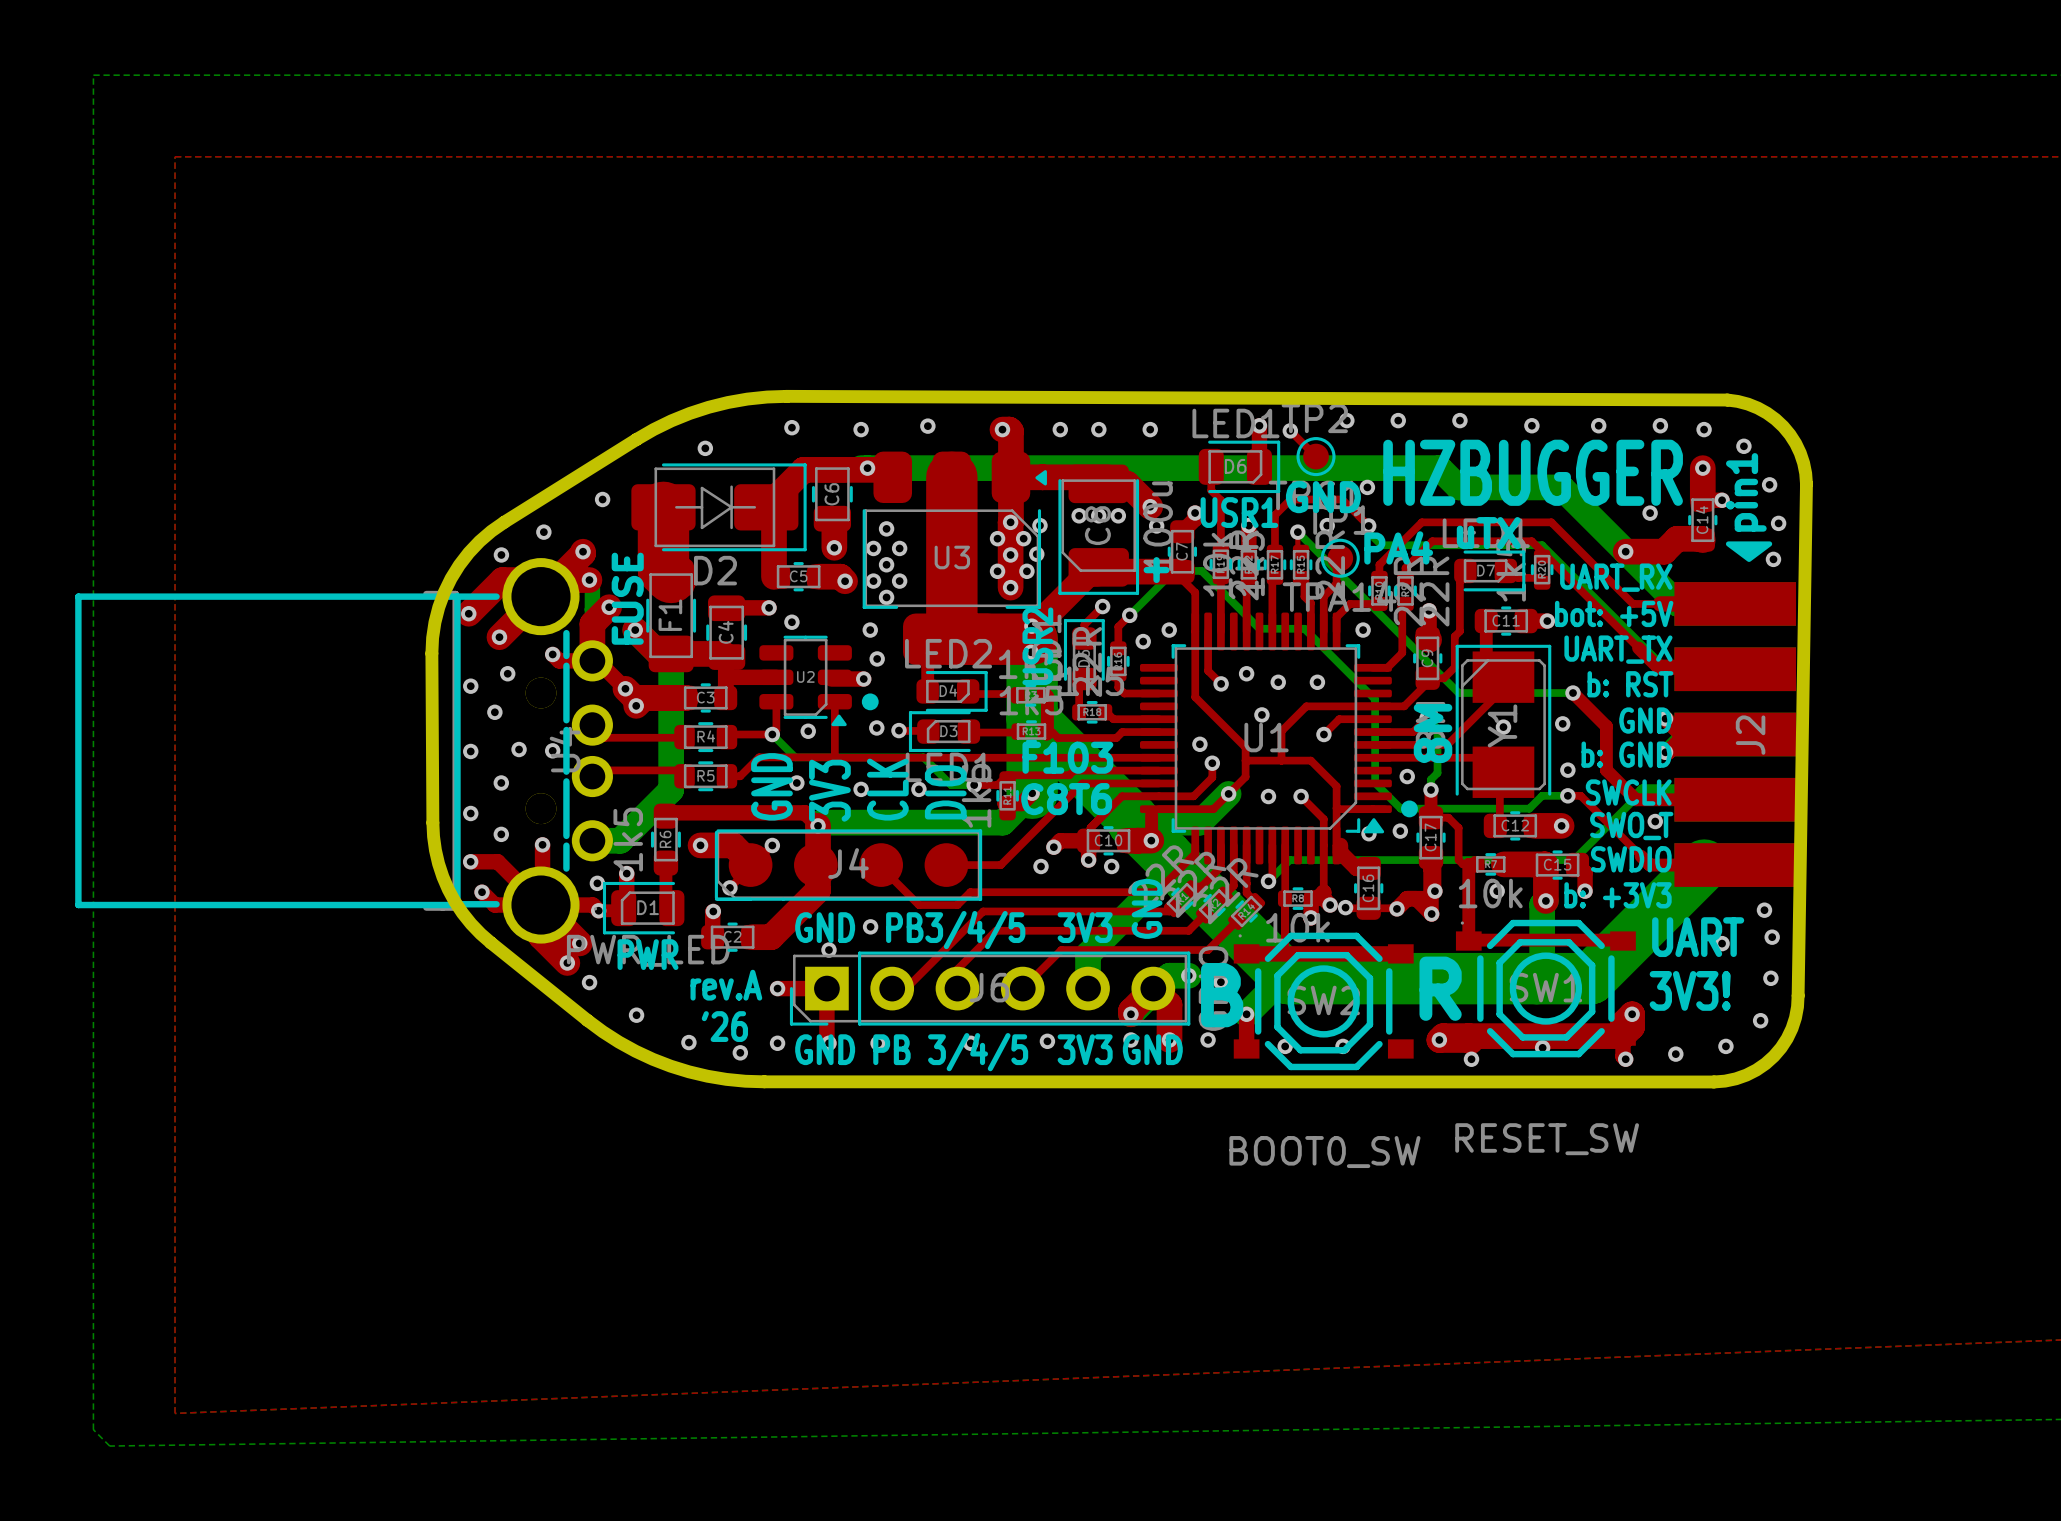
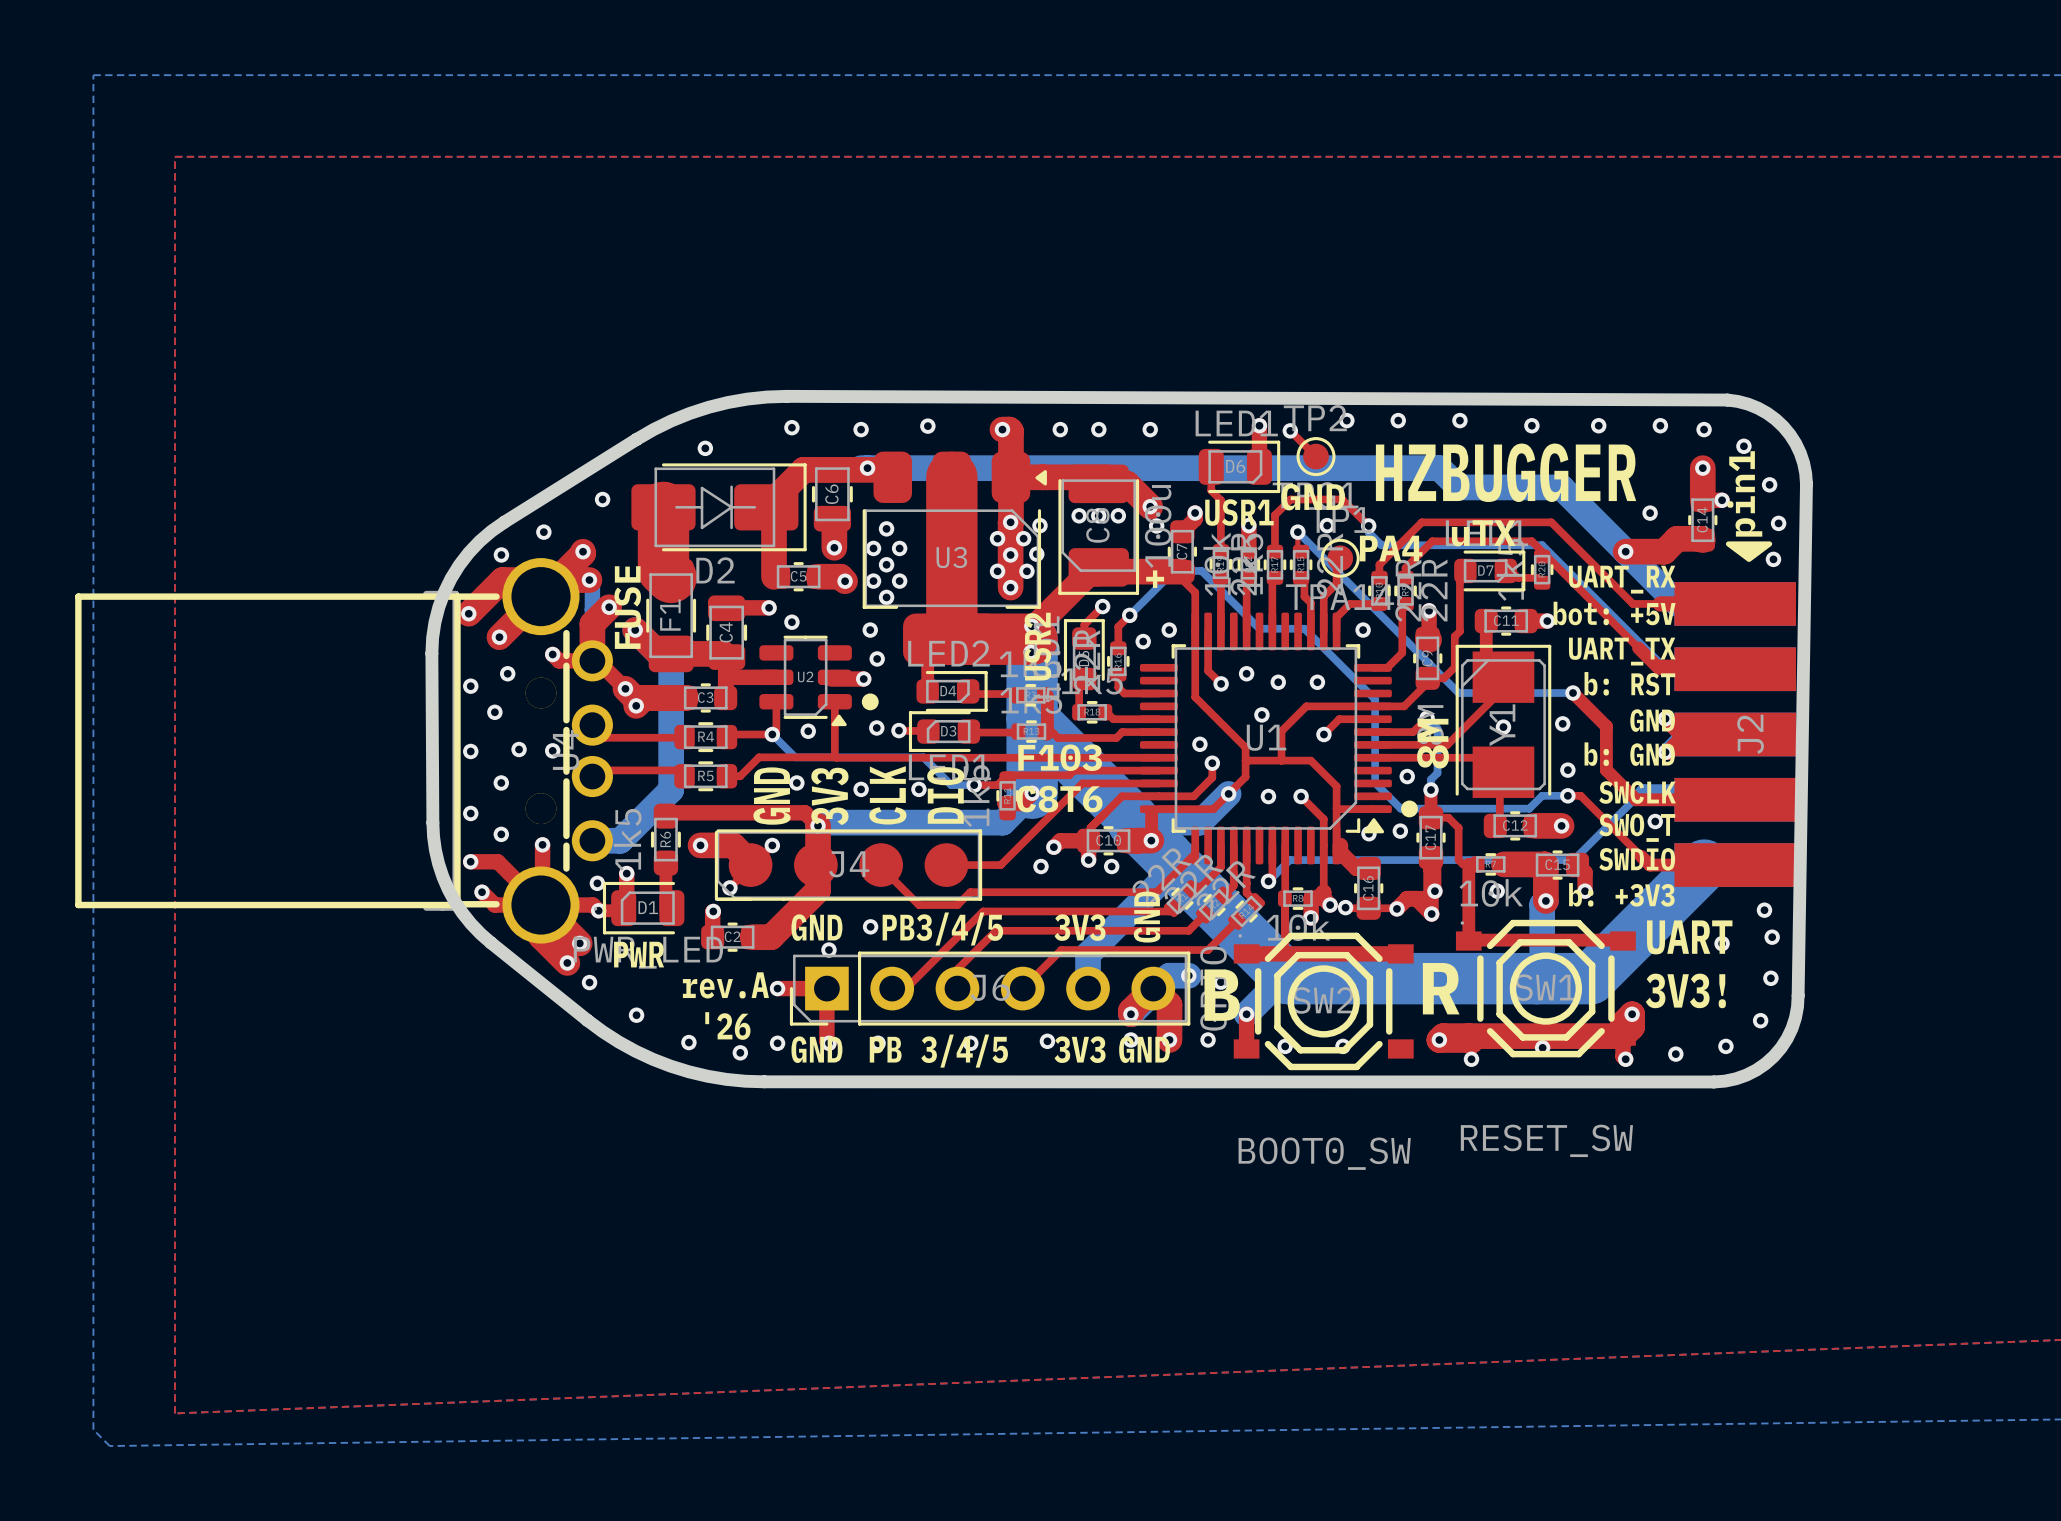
via: (1367, 487) -> none

